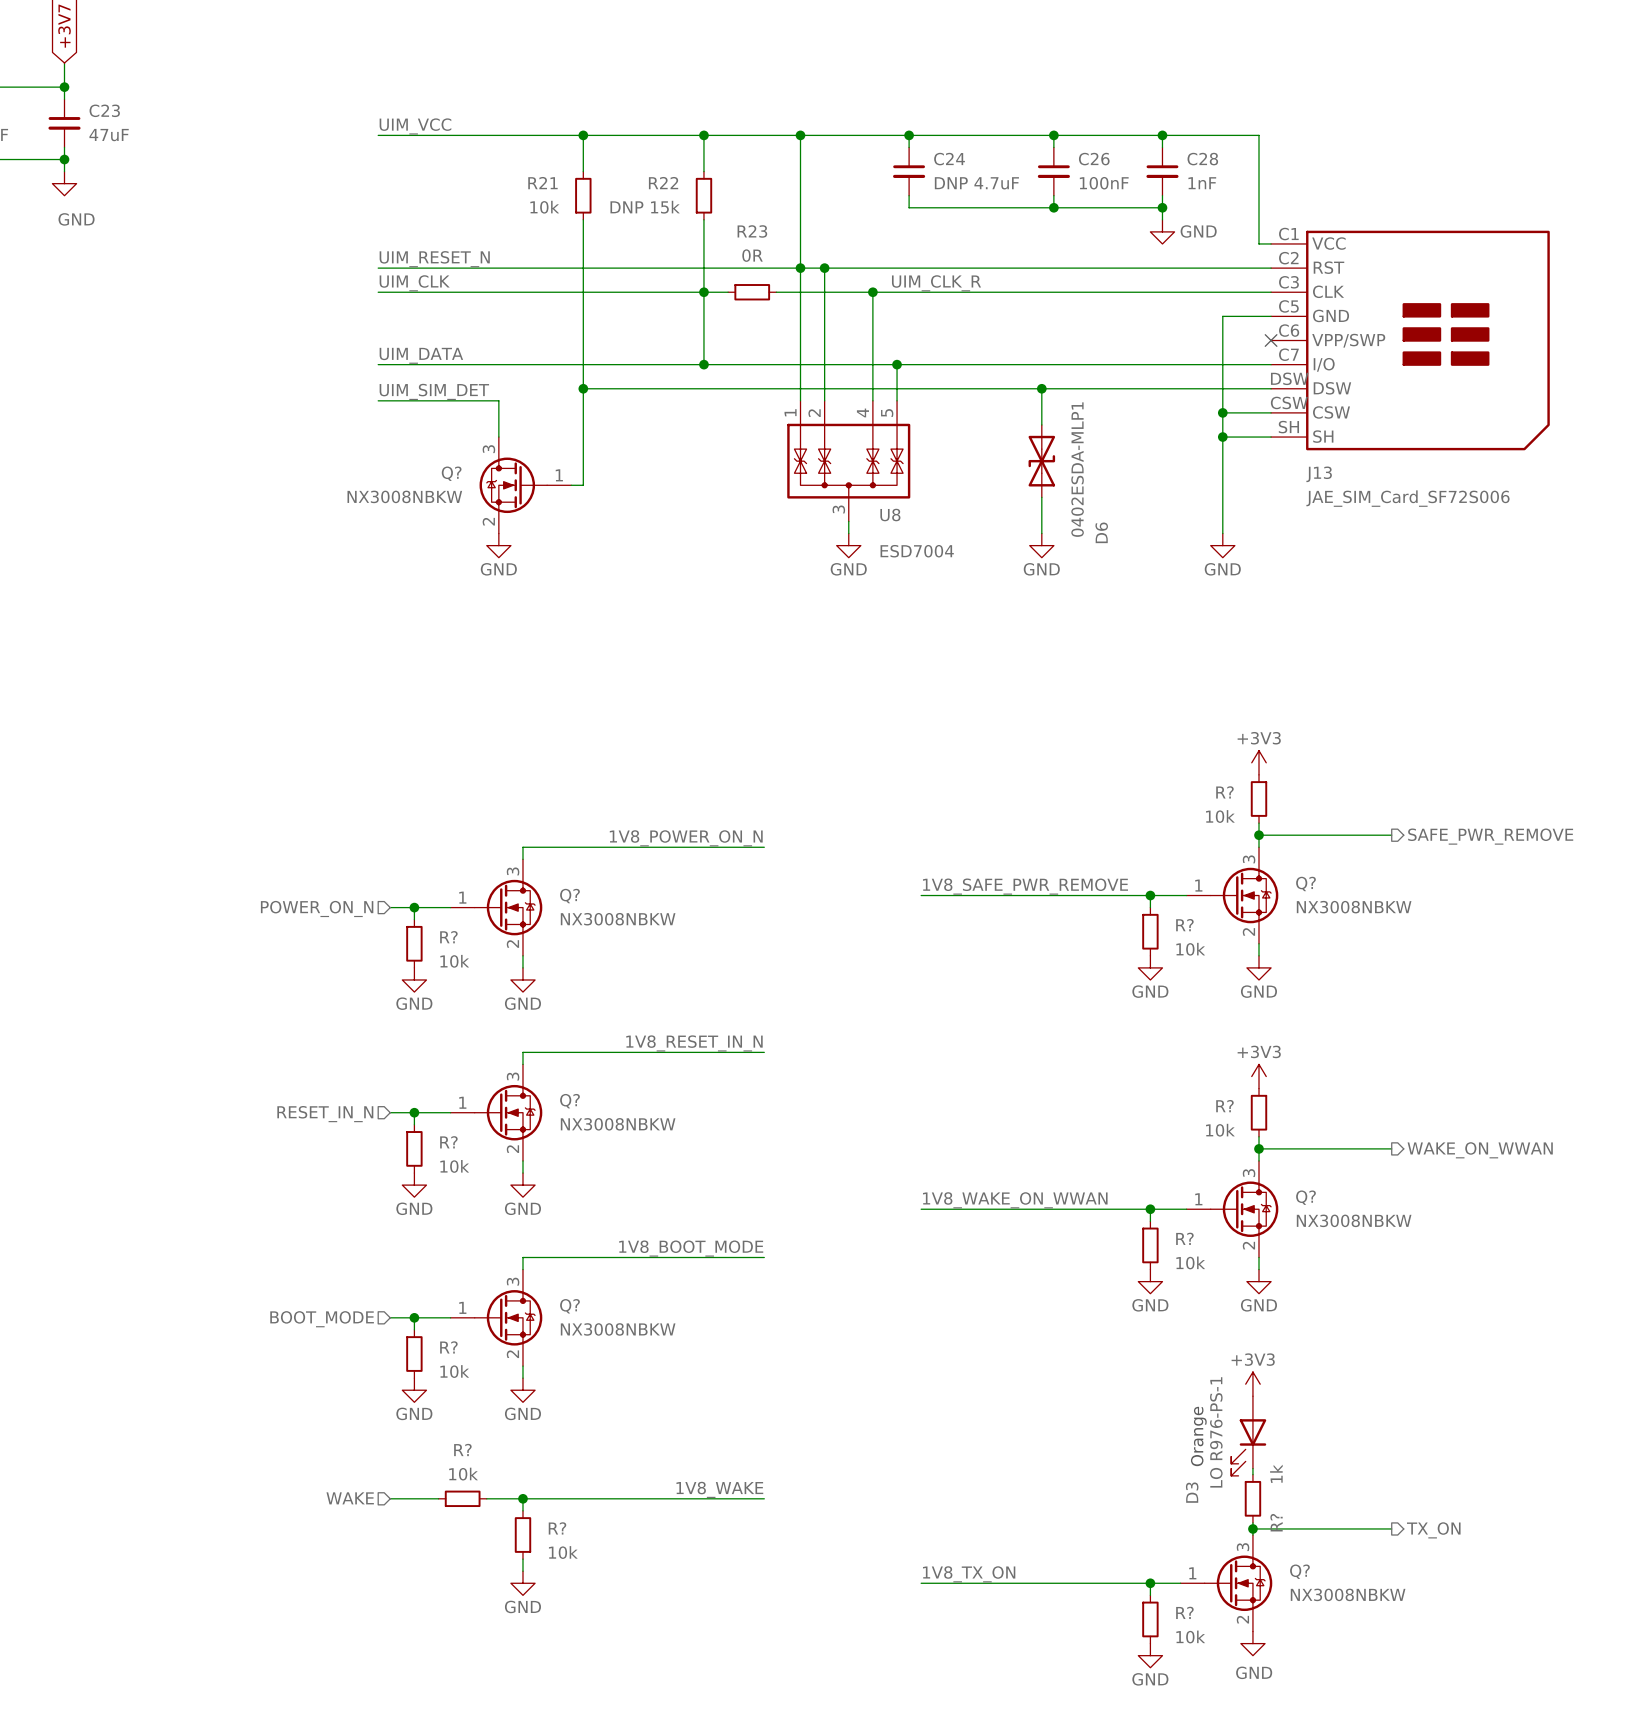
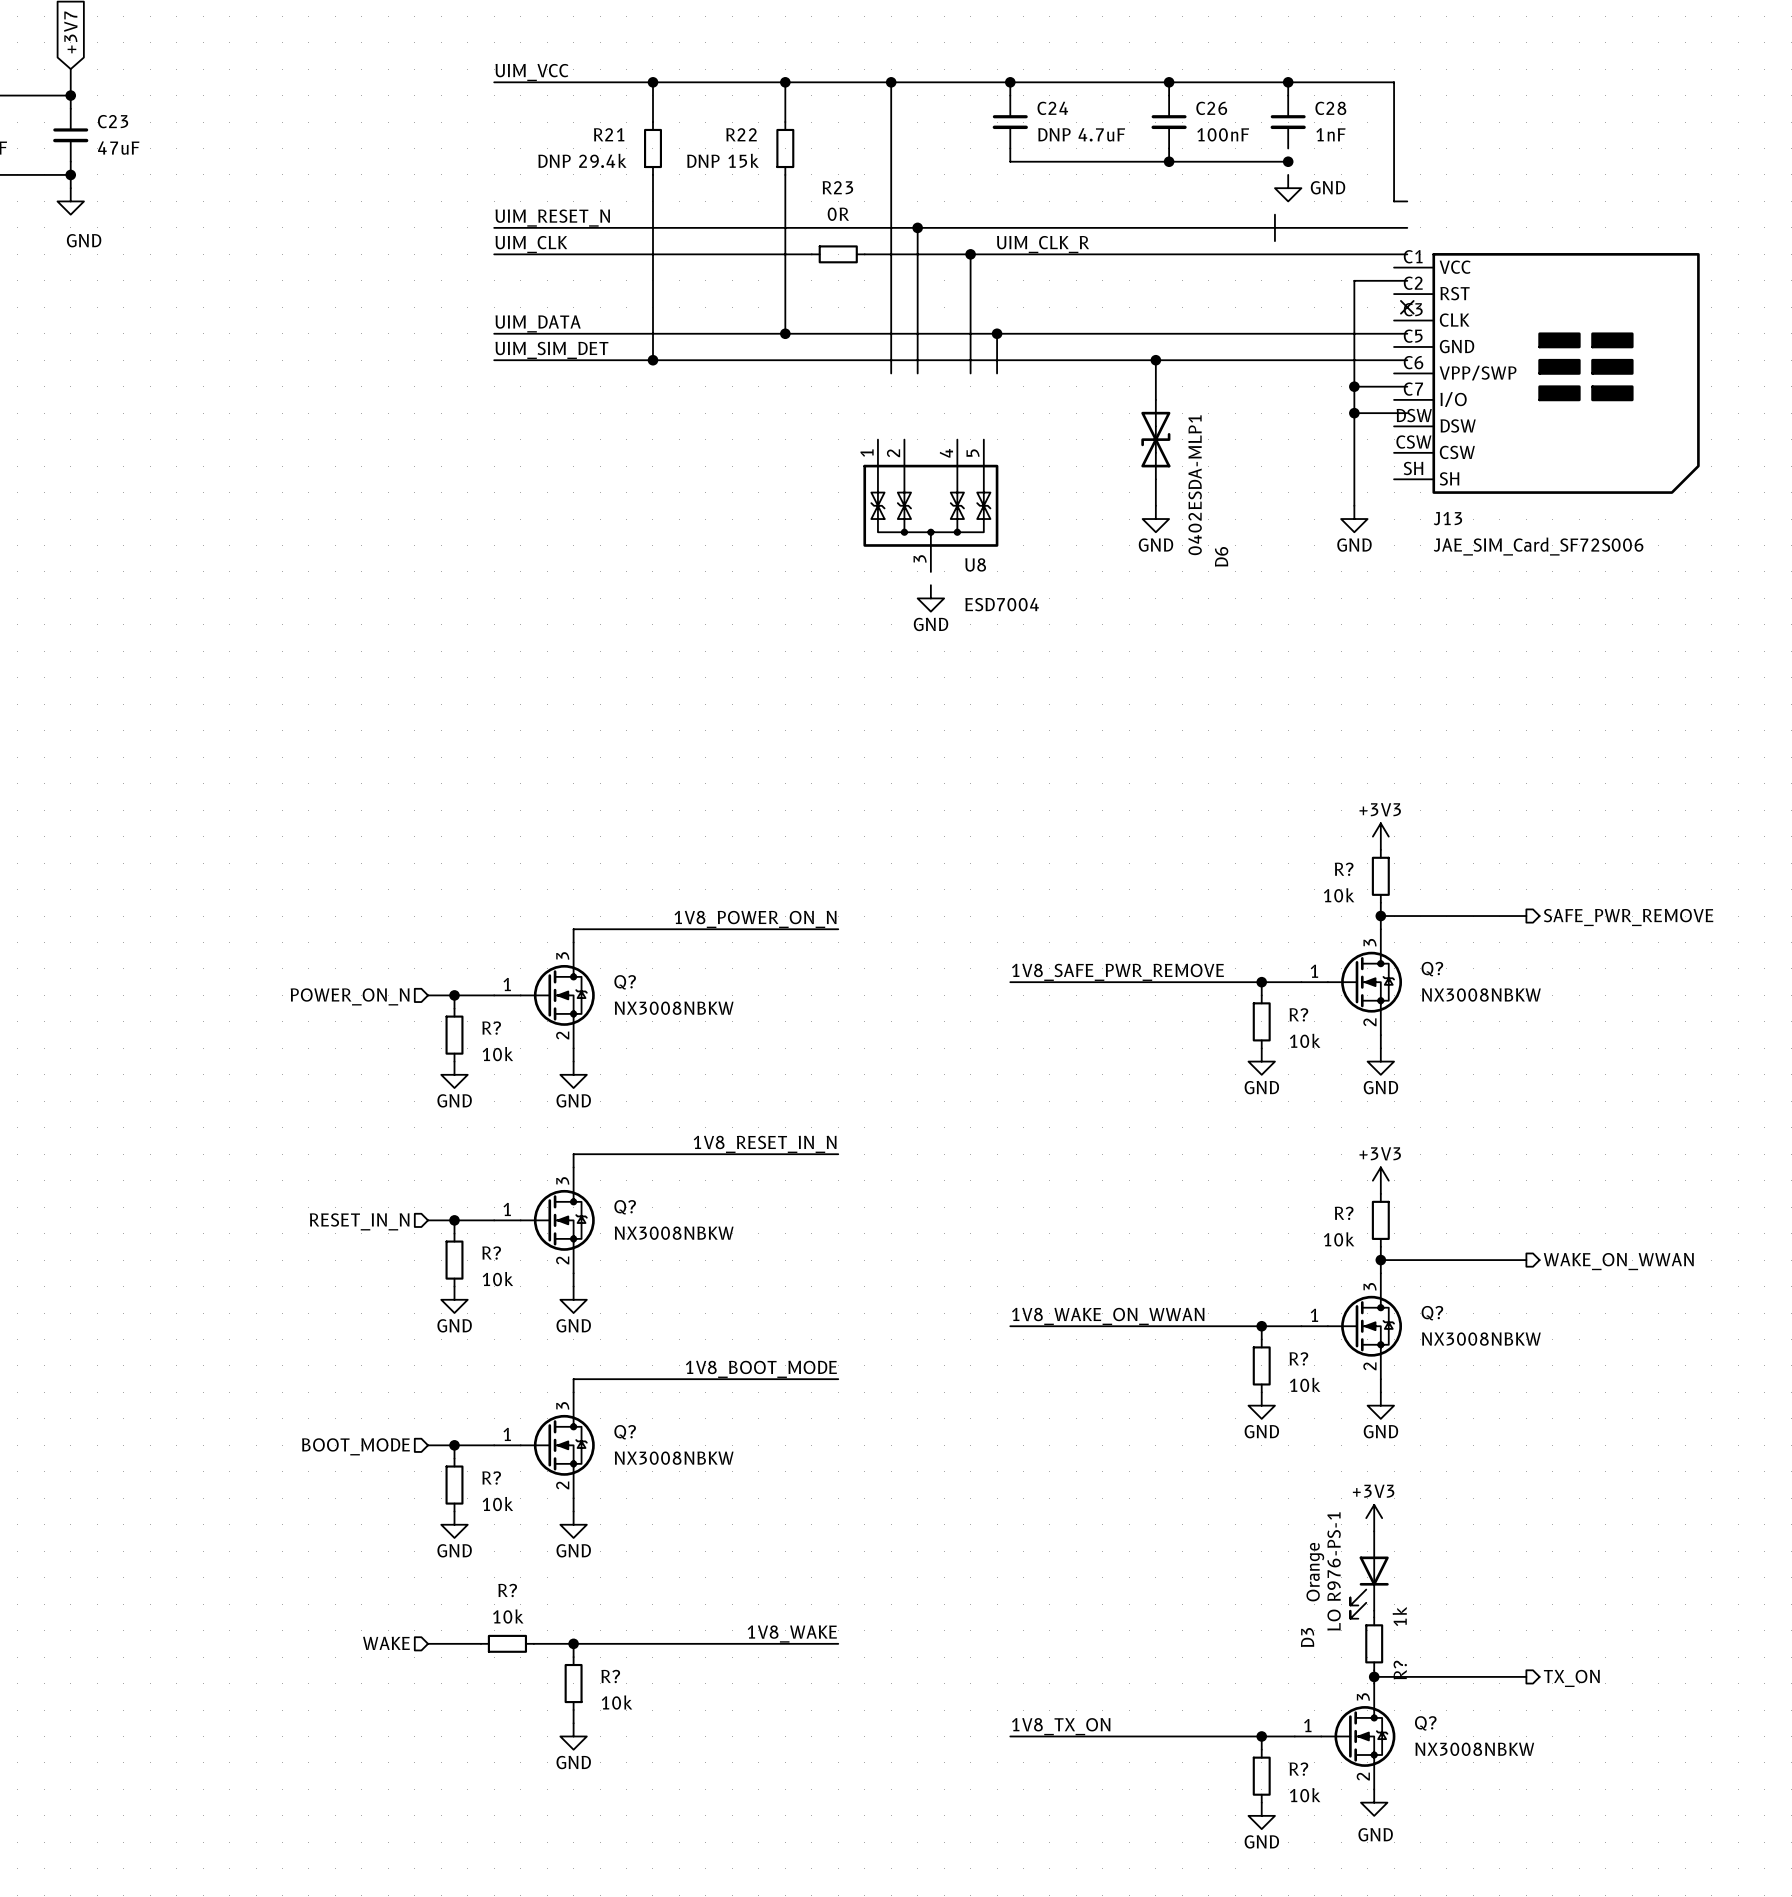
wire: none -> (494, 82) (1394, 82) (1394, 201) (1407, 201)
junction: none -> (652, 82)
junction: none -> (785, 82)
junction: none -> (891, 82)
junction: none -> (1010, 82)
junction: none -> (1169, 82)
junction: none -> (1288, 82)
label position: UIM_VCC (415, 126) -> UIM_VCC (531, 72)
wire: (378, 135) (1259, 135) (1259, 243) (1271, 243) -> none
wire: (583, 135) (583, 171) -> (652, 82) (652, 122)
junction: (583, 135) -> none
wire: (703, 135) (703, 171) -> (785, 82) (785, 122)
junction: (703, 135) -> none
wire: (800, 135) (800, 400) -> (891, 82) (891, 373)
junction: (800, 135) -> none
wire: (909, 135) (909, 147) -> (1010, 82) (1010, 95)
junction: (909, 135) -> none
wire: none -> (1010, 148) (1010, 161) (1288, 161)
wire: (1053, 135) (1053, 147) -> (1169, 82) (1169, 95)
junction position: (1053, 135) -> (1169, 161)
wire: (1162, 135) (1162, 147) -> (1288, 82) (1288, 95)
junction position: (1162, 135) -> (1288, 161)
wire: none -> (652, 174) (652, 360)
C24 position: (909, 171) -> (1010, 122)
C26 position: (1053, 171) -> (1169, 122)
C28 position: (1162, 171) -> (1288, 122)
R21 position: (583, 195) -> (652, 148)
R22 position: (703, 195) -> (785, 148)
wire: (909, 195) (909, 207) -> (494, 227) (997, 227)
wire: (1053, 195) (1053, 207) -> (1169, 148) (1169, 161)
R21 value: 10k (544, 207) -> DNP 29.4k (582, 160)
junction: none -> (917, 227)
junction: (1053, 207) -> none
wire: none -> (1274, 227) (1407, 227)
junction: (1162, 207) -> none
wire: (583, 219) (583, 485) (571, 485) -> none
wire: (703, 219) (703, 364) -> (785, 174) (785, 333)
wire: none -> (494, 254) (811, 254)
junction: none -> (970, 254)
power symbol position: GND (1162, 231) -> GND (1288, 188)
wire: none -> (1407, 280) (1354, 280) (1354, 505)
label position: UIM_RESET_N (434, 259) -> UIM_RESET_N (552, 218)
wire: (378, 268) (1271, 268) -> none
junction: (800, 268) -> none
wire: (824, 268) (824, 400) -> (917, 227) (917, 373)
junction: (824, 268) -> none
no-connect mark: none -> (1407, 307)
label position: UIM_CLK (414, 283) -> UIM_CLK (531, 244)
label position: UIM_CLK_R (936, 283) -> UIM_CLK_R (1043, 244)
wire: (378, 292) (728, 292) -> none
junction position: (703, 292) -> (785, 333)
R23 position: (752, 292) -> (838, 254)
wire: (776, 292) (1271, 292) -> (864, 254) (1407, 254)
wire: (872, 292) (872, 400) -> (970, 254) (970, 373)
junction: (872, 292) -> none
wire: none -> (494, 333) (1407, 333)
junction: none -> (997, 333)
wire: (1271, 316) (1222, 316) (1222, 533) -> none
wire: none -> (494, 360) (1407, 360)
junction: none -> (652, 360)
junction: none -> (1155, 360)
no-connect mark: (1271, 340) -> none
junction: none -> (1354, 386)
label position: UIM_DATA (421, 355) -> UIM_DATA (538, 323)
wire: (378, 364) (1271, 364) -> none
junction: (703, 364) -> none
wire: (897, 364) (897, 400) -> (997, 333) (997, 373)
junction: (897, 364) -> none
junction: none -> (1354, 413)
wire: (583, 388) (1271, 388) -> none
junction: (583, 388) -> none
wire: (1041, 388) (1041, 424) -> (1155, 360) (1155, 399)
junction: (1041, 388) -> none
label position: UIM_SIM_DET (434, 391) -> UIM_SIM_DET (551, 350)
wire: (378, 400) (498, 400) (498, 437) -> none
wire: (1222, 412) (1271, 412) -> (1354, 386) (1407, 386)
junction: (1222, 412) -> none
wire: none -> (1155, 479) (1155, 505)
wire: (1222, 437) (1271, 437) -> (1354, 413) (1407, 413)
junction: (1222, 437) -> none
D6 position: (1041, 461) -> (1155, 439)
D6 value position: 0402ESDA-MLP1 (1077, 469) -> 0402ESDA-MLP1 (1195, 485)
Q?: NX3008NBKW (525, 485) -> none
wire: (1041, 497) (1041, 533) -> none
wire: (848, 521) (848, 533) -> none
D6 name position: D6 (1101, 532) -> D6 (1221, 556)
power symbol: GND (498, 545) -> none
power symbol position: GND (1041, 545) -> GND (1155, 519)
power symbol position: GND (1222, 545) -> GND (1354, 519)

